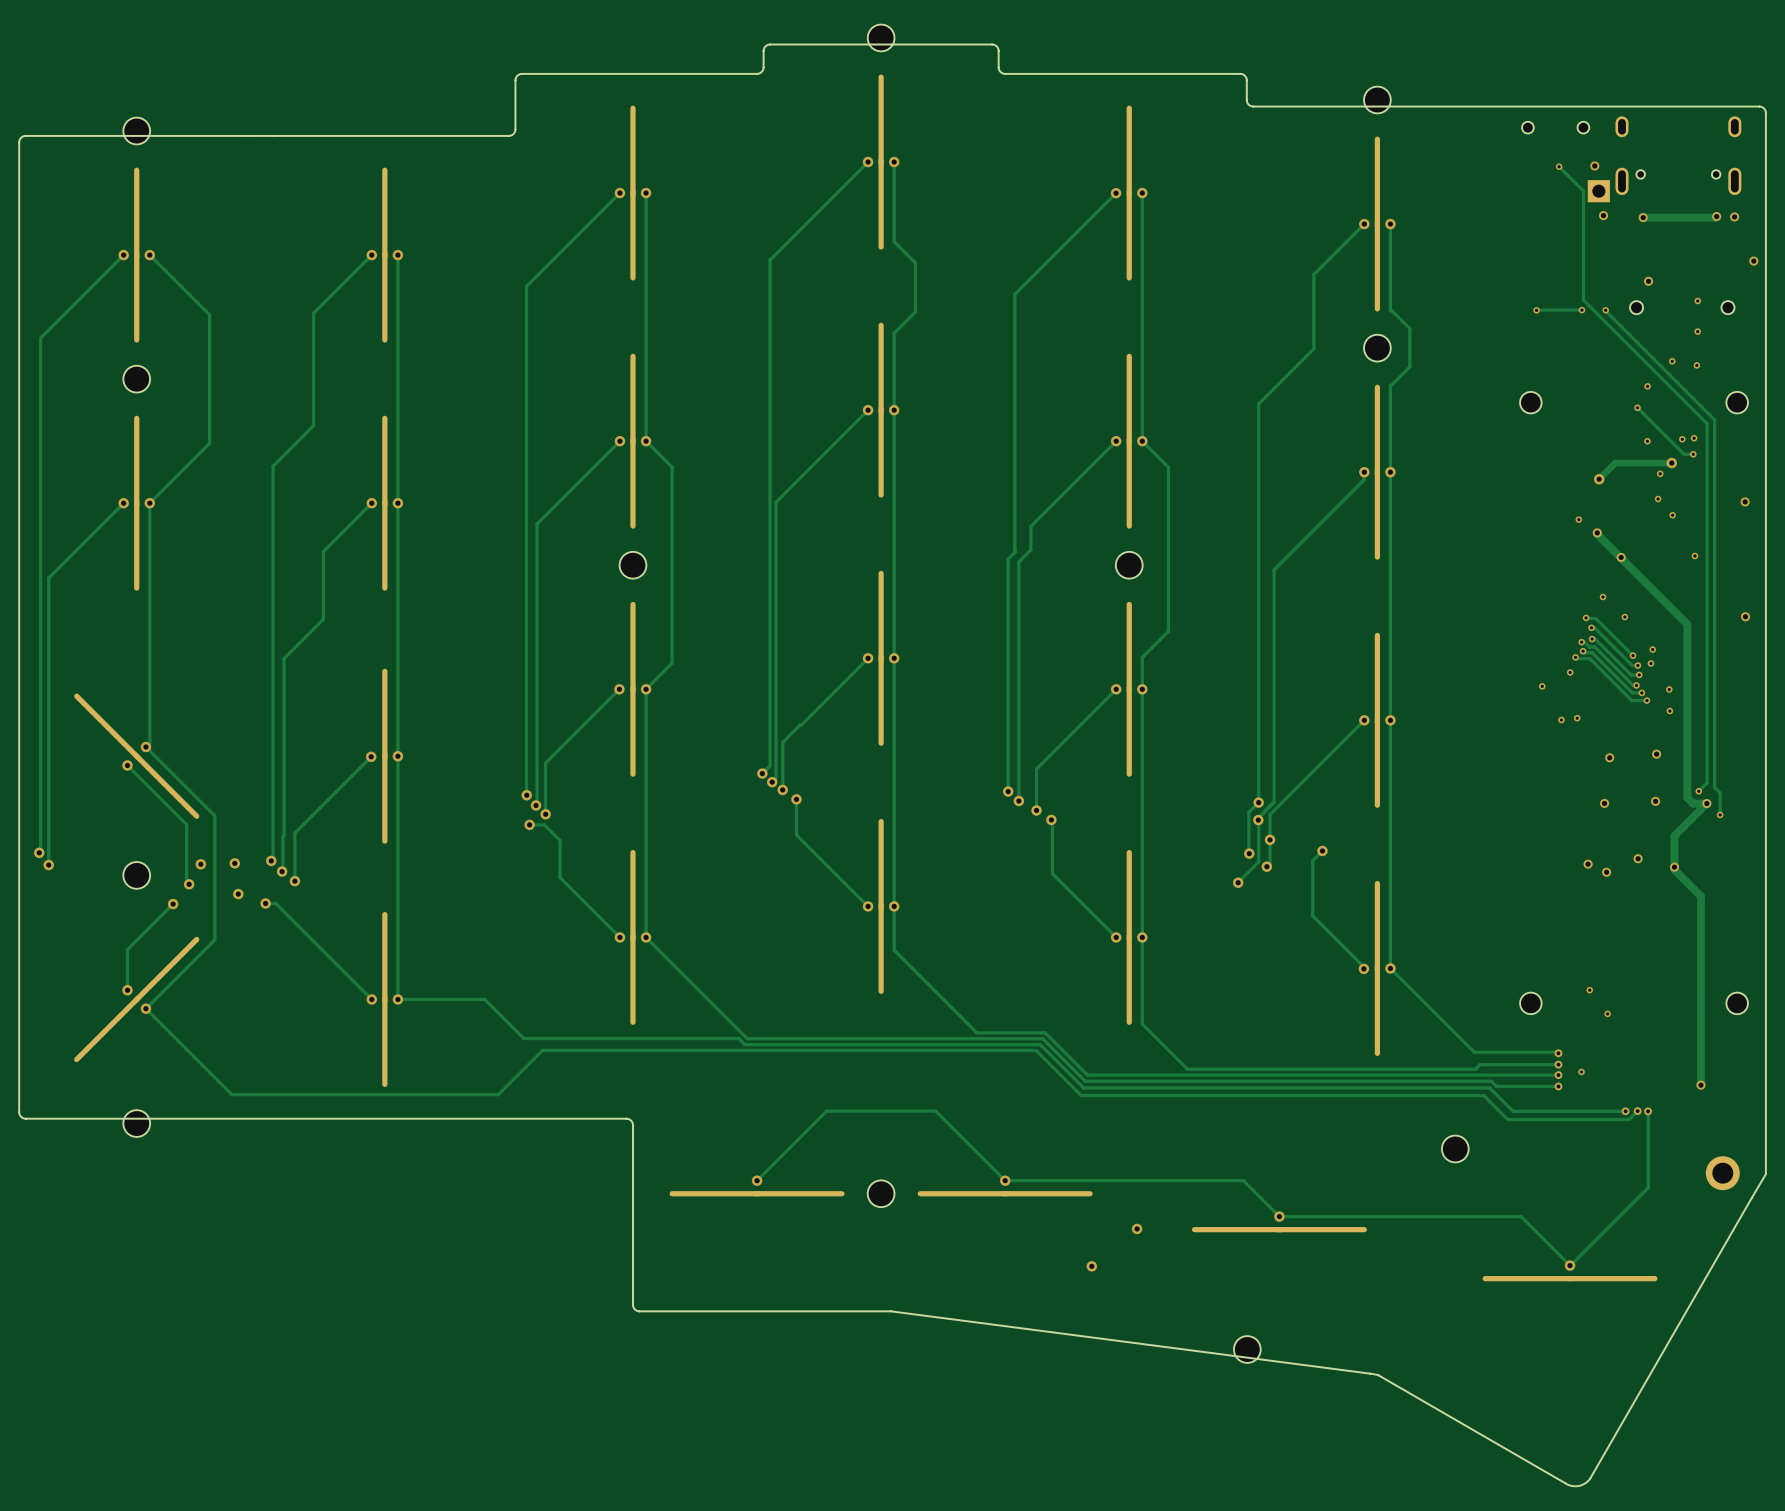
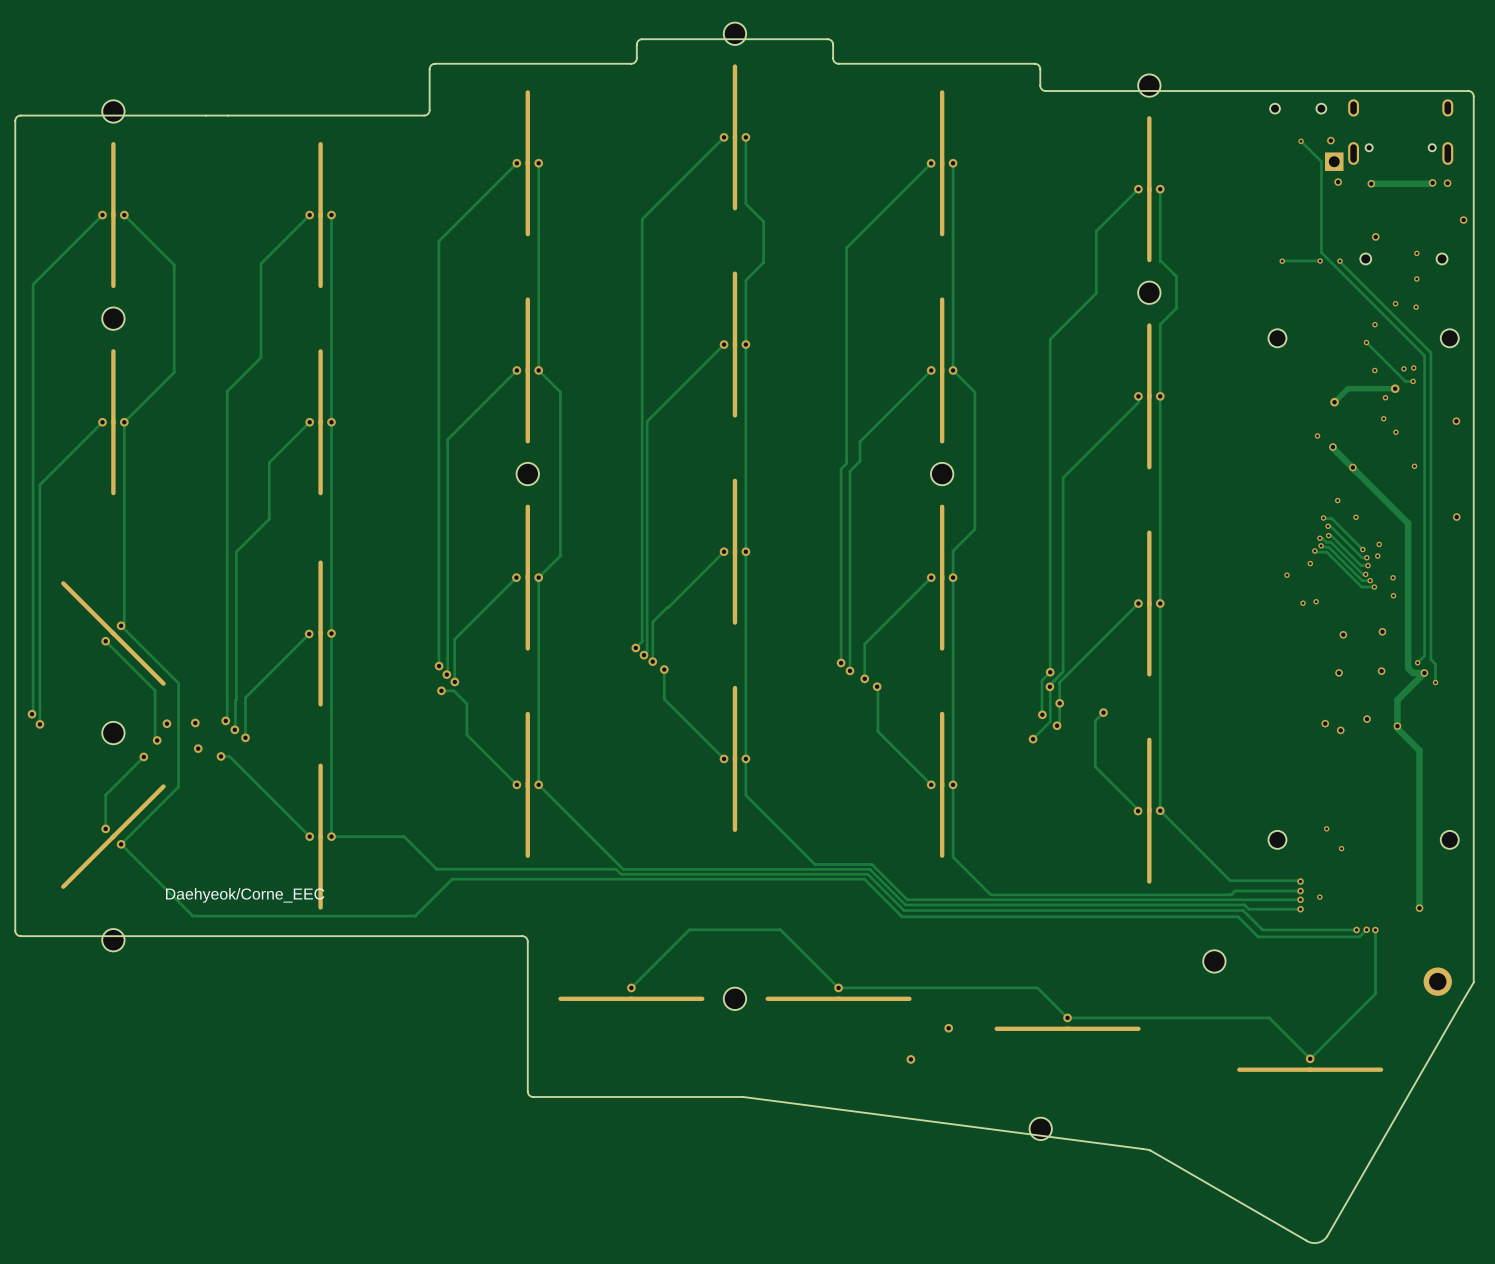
text: none -> Daehyeok/Corne_EEC (245, 895)

